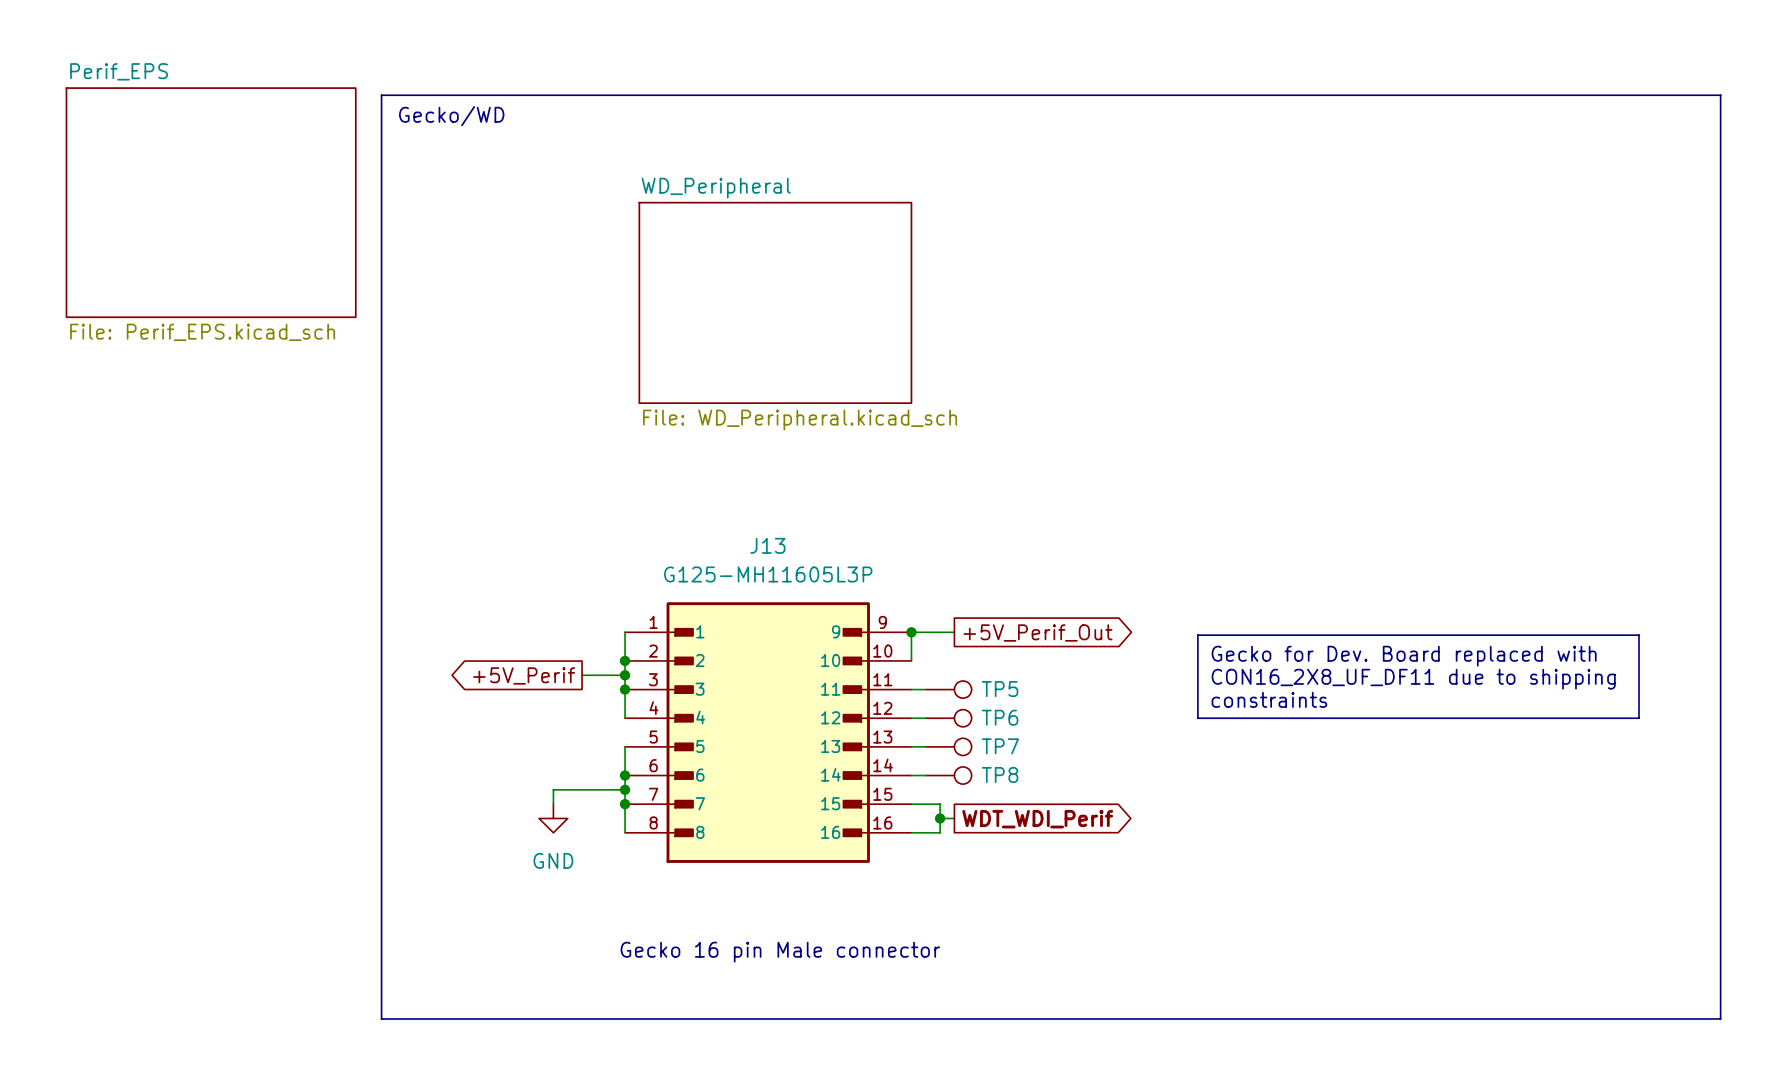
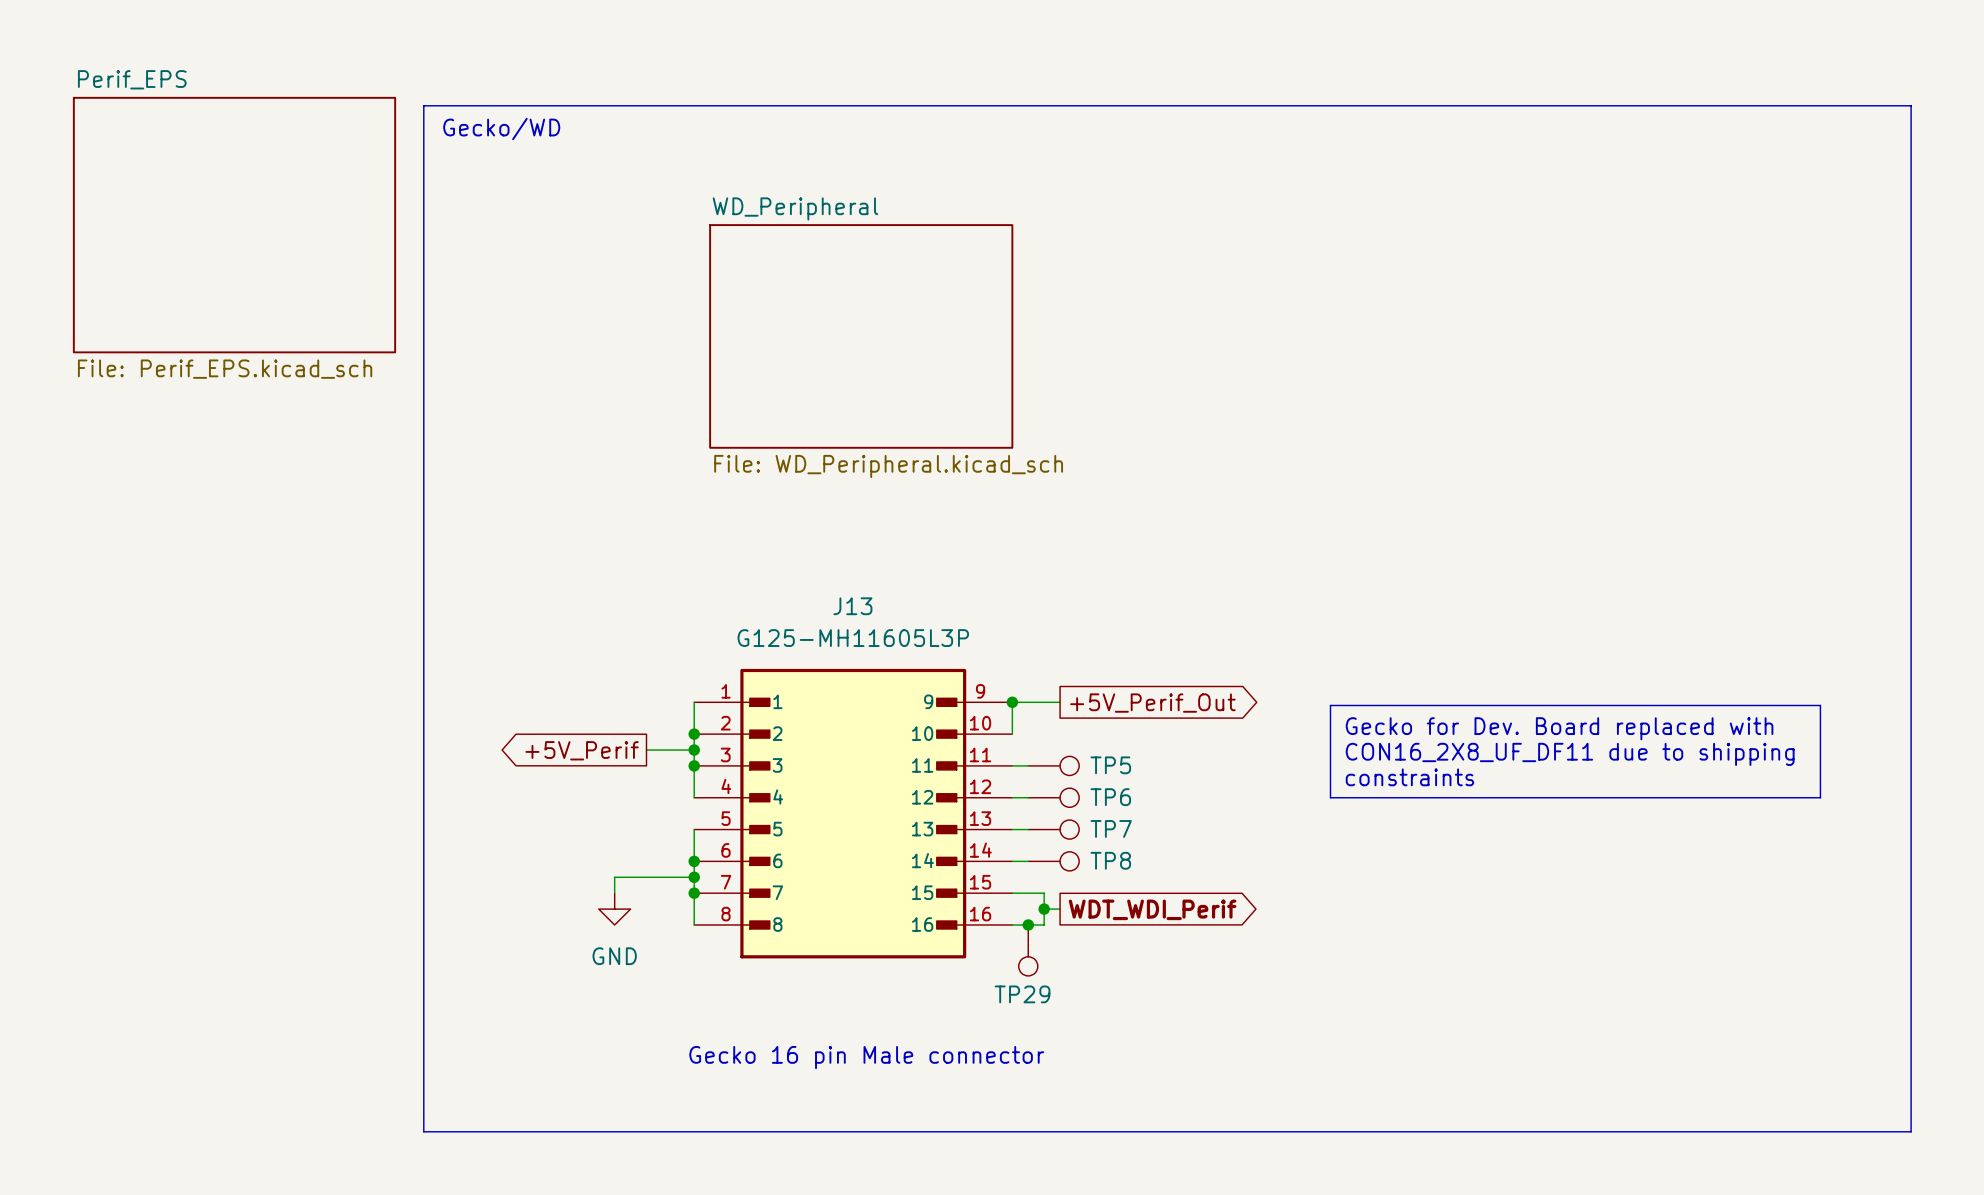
junction: none -> (1028, 925)
TP29: none -> (1028, 950)

